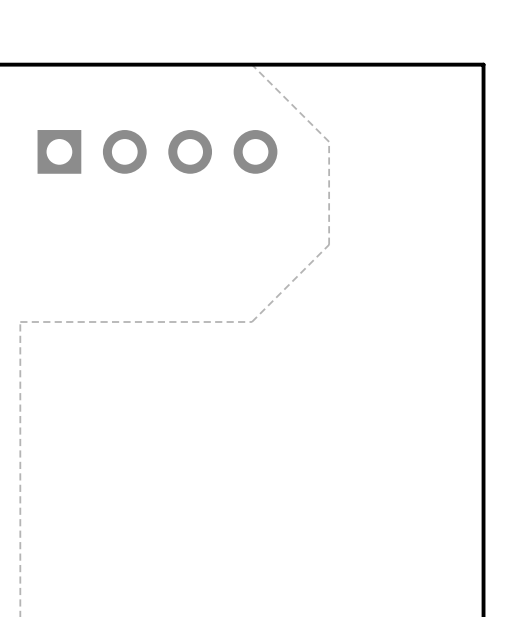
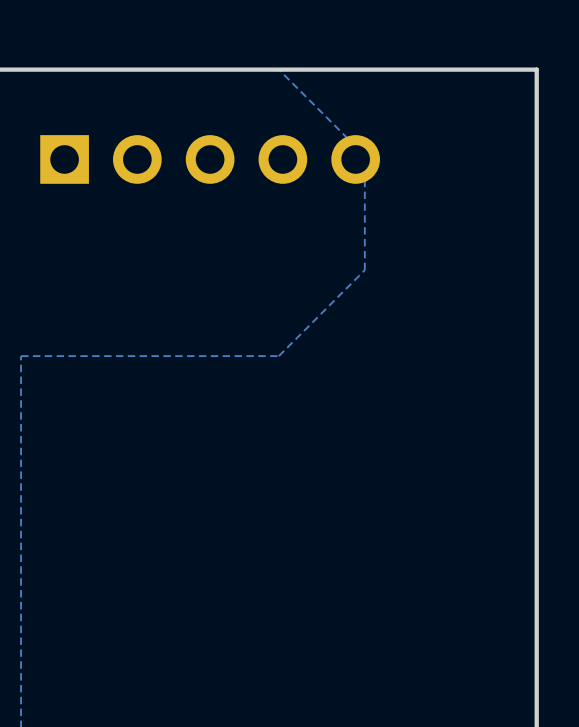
part: none -> (210, 159)
part: (157, 151) -> none

